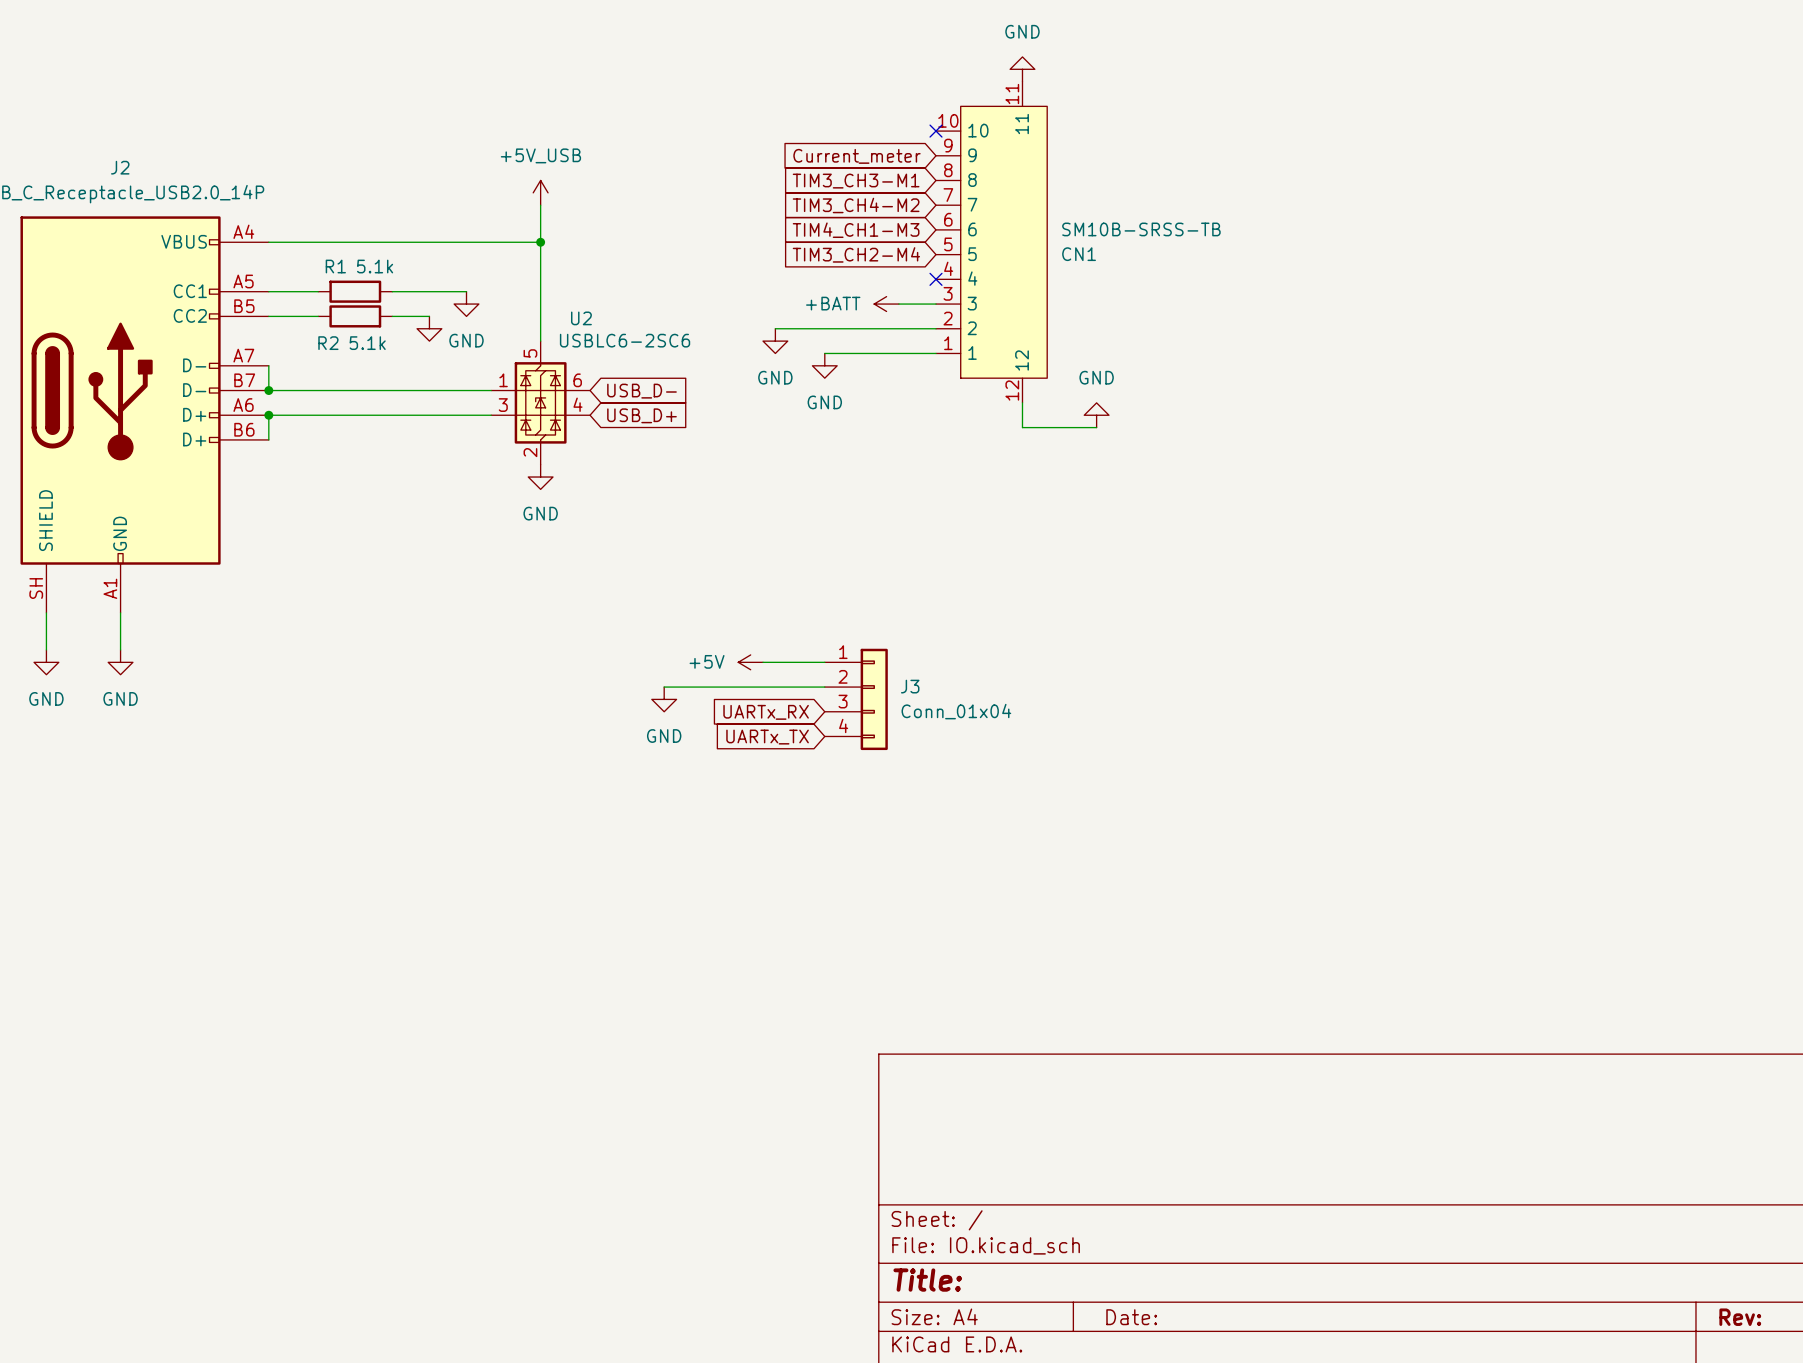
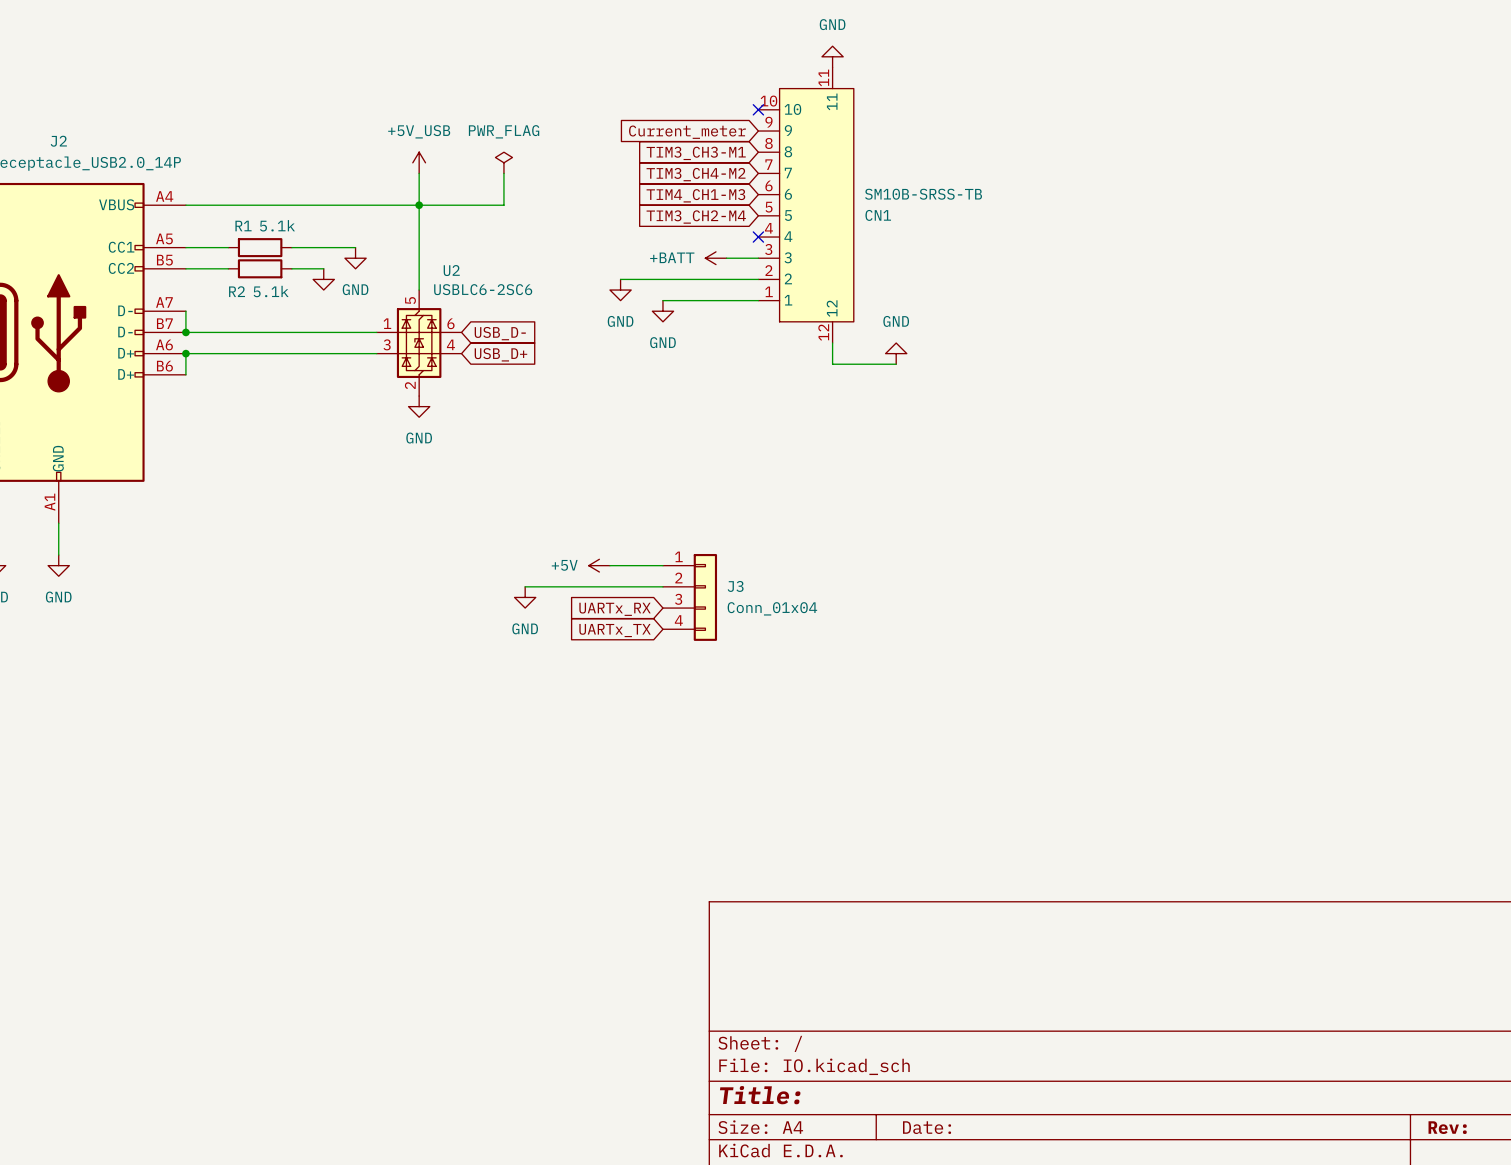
power symbol: none -> PWR_FLAG (503, 162)
wire: none -> (503, 173) (503, 205) (419, 205)

